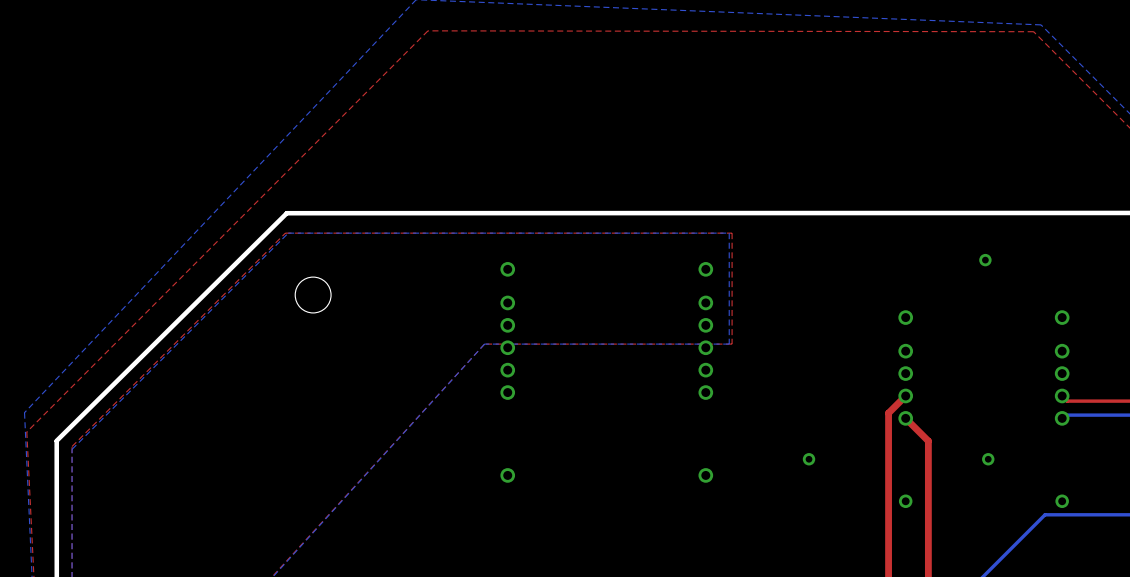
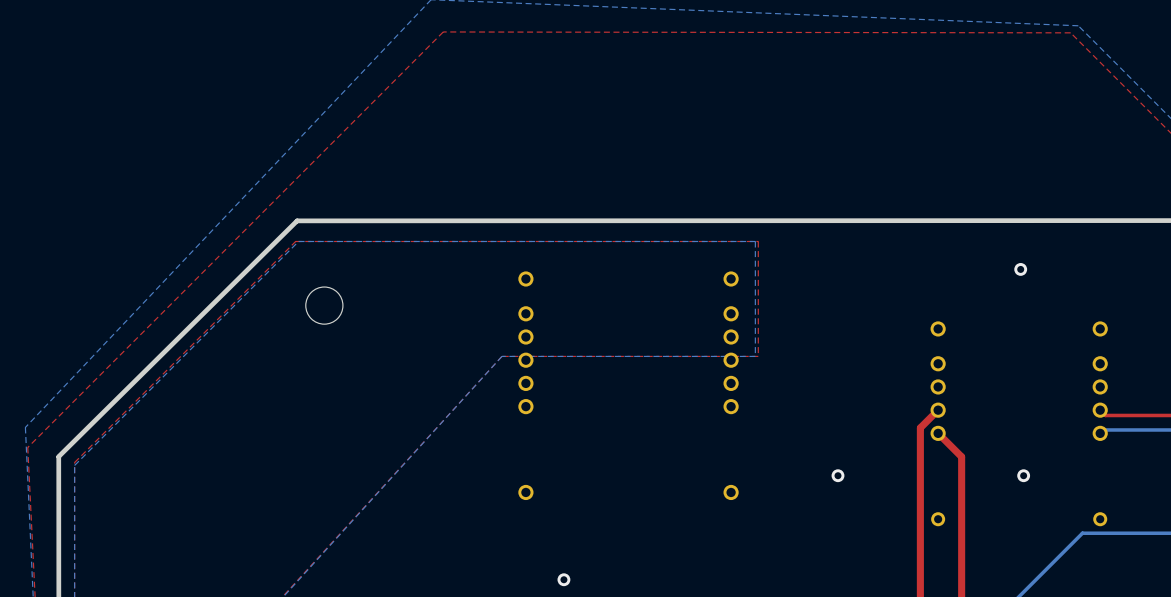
via: none -> (563, 579)

